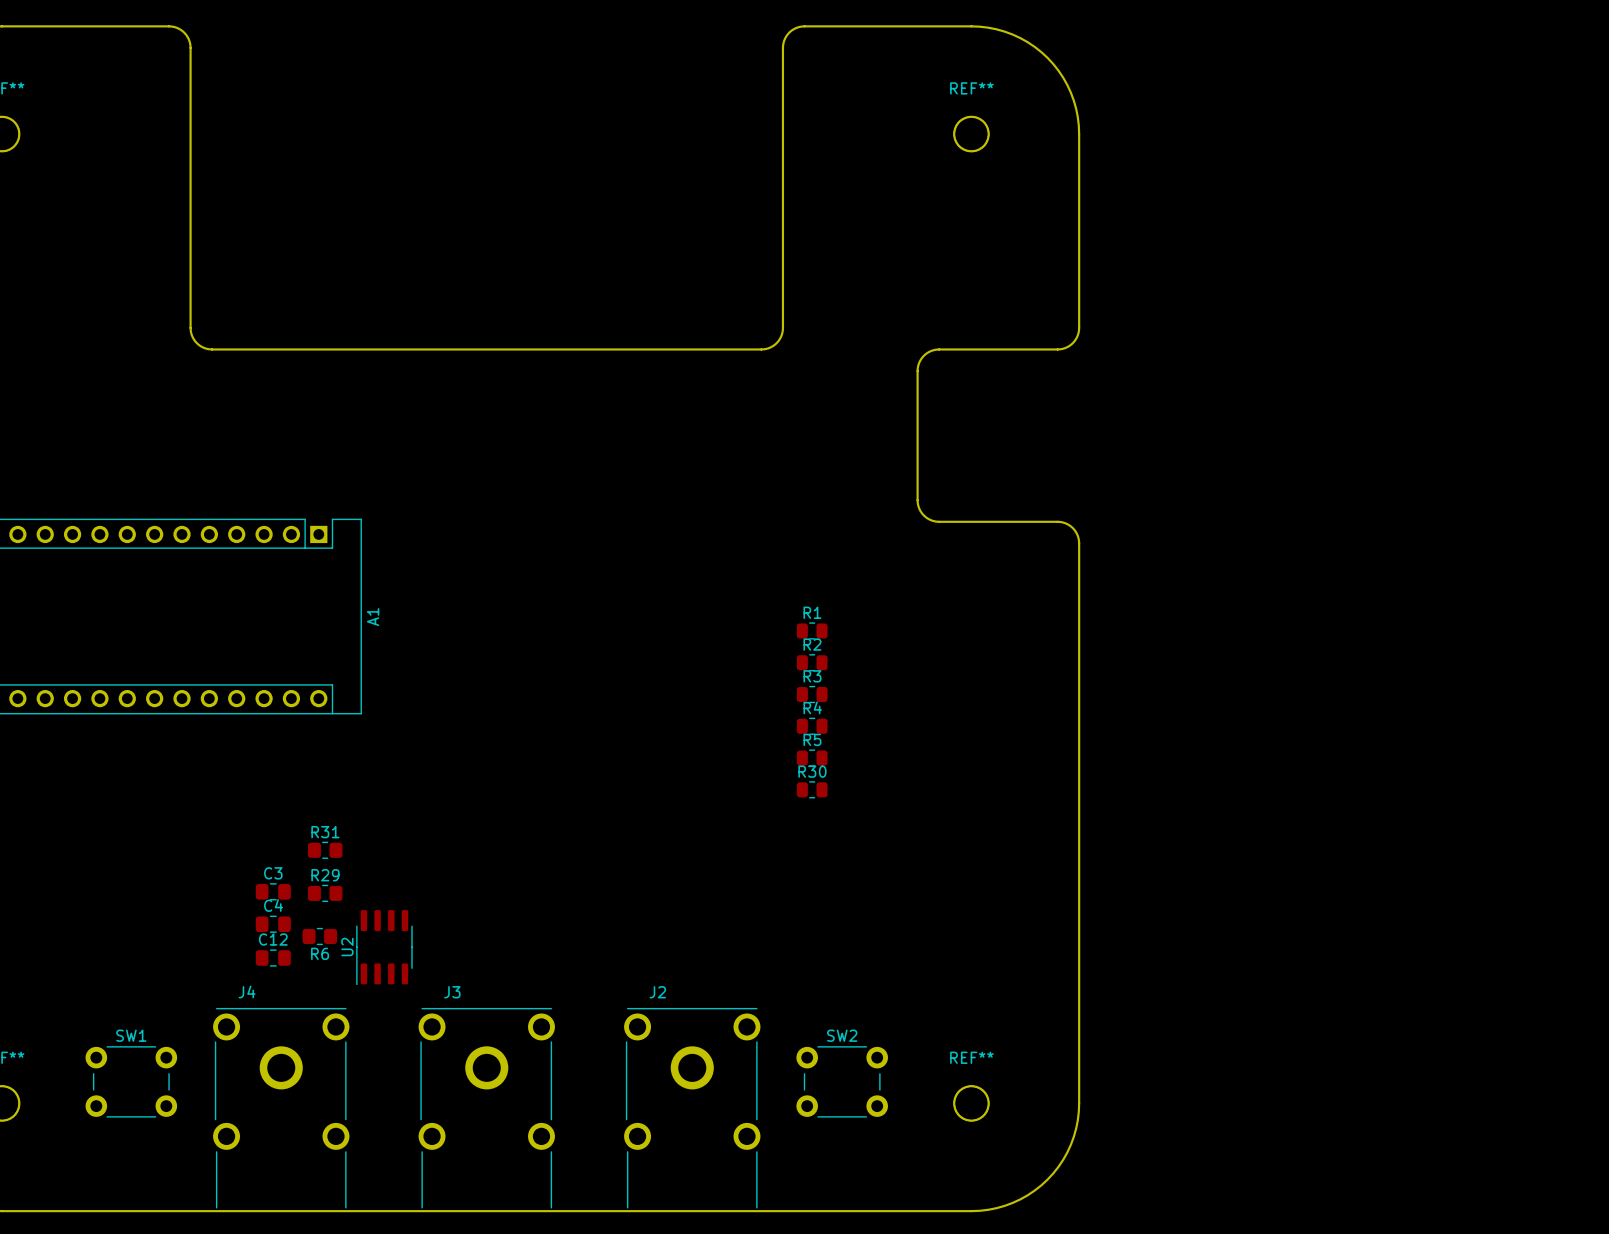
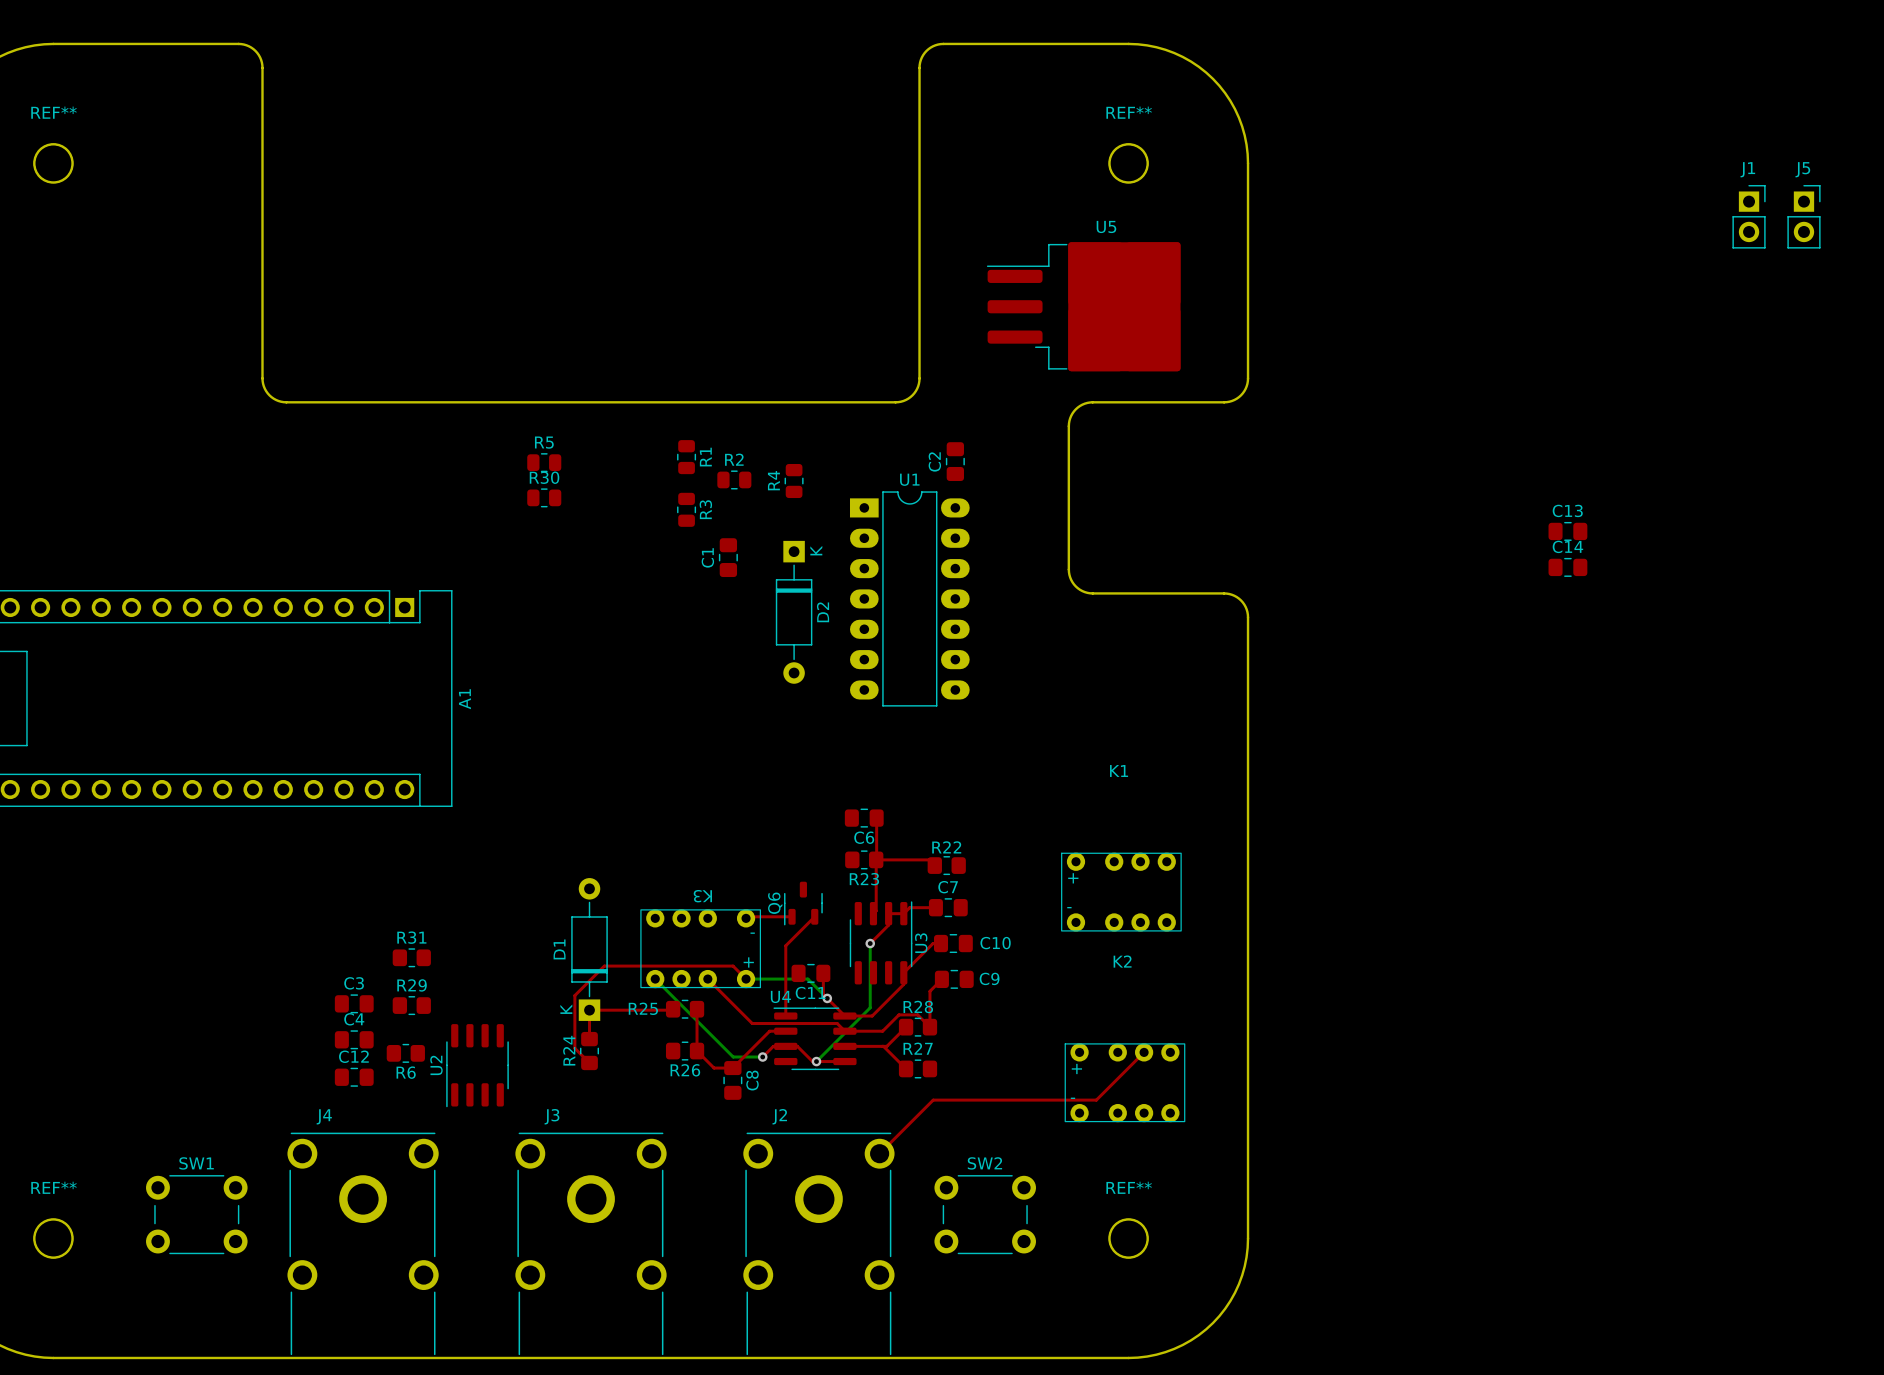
J1: none -> (1749, 216)
J5: none -> (1803, 216)
U5: none -> (1083, 306)
C2: none -> (955, 461)
C13: none -> (1567, 531)
C1: none -> (728, 557)
C14: none -> (1567, 567)
U1: none -> (909, 598)
D2: none -> (794, 612)
R1 rotation: 0° (812, 630) -> 90° clockwise (686, 457)
R1 position: (812, 630) -> (686, 457)
R2 position: (812, 662) -> (734, 479)
R3 rotation: 0° (812, 694) -> 90° clockwise (686, 509)
R3 position: (812, 694) -> (686, 509)
R4 name position: R4 (812, 707) -> R4 (773, 480)
C6: none -> (864, 818)
top track: none -> (876, 818) (876, 859)
R4 rotation: 0° (812, 726) -> 90° clockwise (794, 481)
R4 position: (812, 726) -> (794, 481)
R5 position: (812, 758) -> (544, 462)
R23: none -> (864, 859)
top track: none -> (876, 859) (929, 859) (934, 865)
top track: none -> (876, 859) (876, 910) (873, 913)
R22: none -> (946, 865)
R30 position: (812, 789) -> (544, 497)
K1: none -> (1121, 892)
Q6: none -> (803, 903)
top track: none -> (935, 907) (909, 907) (903, 913) (888, 913) (888, 925) (870, 943)
C7: none -> (948, 907)
top track: none -> (792, 916) (747, 916) (746, 918)
top track: none -> (814, 916) (785, 945) (785, 1016)
U3: none -> (881, 942)
bottom track: none -> (870, 943) (870, 1007) (816, 1061)
via: none -> (870, 943)
top track: none -> (941, 943) (933, 943) (903, 972) (903, 984) (872, 1016) (844, 1016) (823, 994) (823, 973)
C10: none -> (953, 943)
D1: none -> (589, 949)
K3: none -> (700, 948)
C11: none -> (810, 973)
bottom track: none -> (655, 979) (733, 1057) (762, 1057)
top track: none -> (707, 979) (752, 1023) (837, 1023) (844, 1031) (882, 1031) (898, 1014) (917, 1014) (929, 1027) (929, 991) (941, 979)
top track: none -> (746, 979) (733, 966) (604, 966) (574, 995) (574, 1048) (589, 1062)
bottom track: none -> (746, 979) (807, 979) (827, 998)
C9: none -> (954, 979)
via: none -> (827, 998)
top track: none -> (673, 1009) (589, 1010) (589, 1039)
R25: none -> (685, 1009)
top track: none -> (697, 1009) (697, 1051) (714, 1068) (732, 1068) (769, 1031) (785, 1031)
top track: none -> (906, 1027) (886, 1046) (844, 1046)
R28: none -> (918, 1027)
U4: none -> (814, 1038)
top track: none -> (883, 1046) (906, 1068)
R24: none -> (589, 1051)
R26: none -> (685, 1051)
top track: none -> (1144, 1052) (1096, 1100) (933, 1100) (879, 1153)
top track: none -> (762, 1057) (773, 1046) (797, 1046) (812, 1061) (844, 1061)
via: none -> (762, 1057)
via: none -> (816, 1061)
R27: none -> (918, 1068)
C8: none -> (732, 1080)
K2: none -> (1124, 1082)

